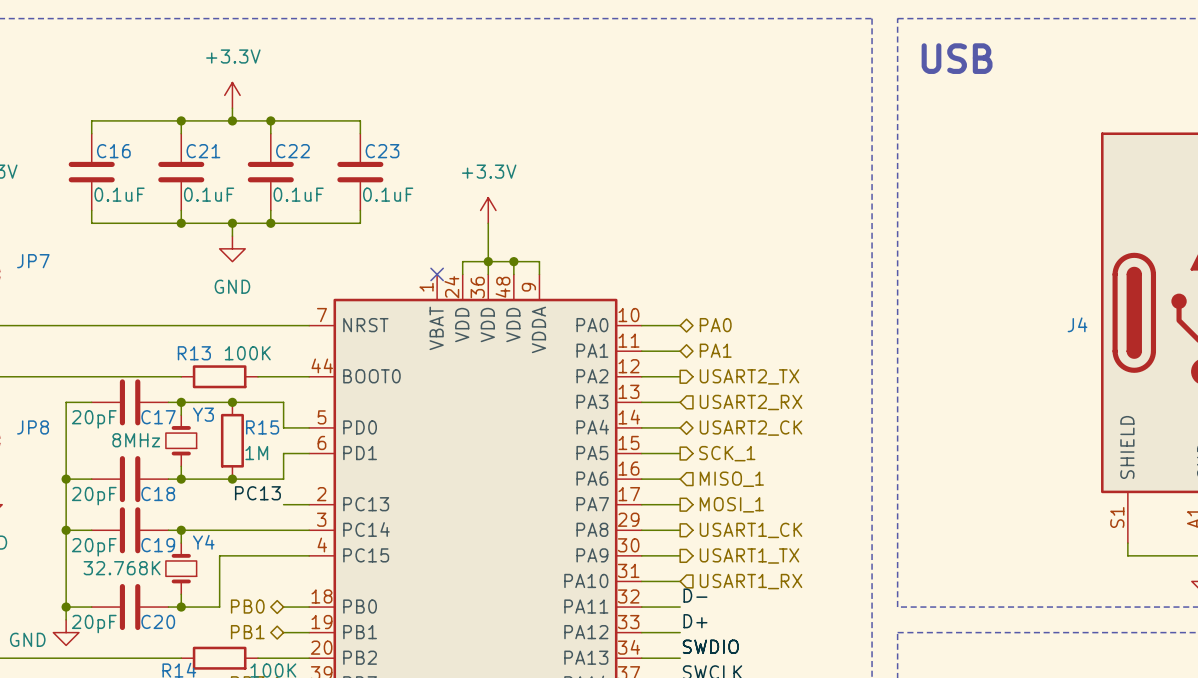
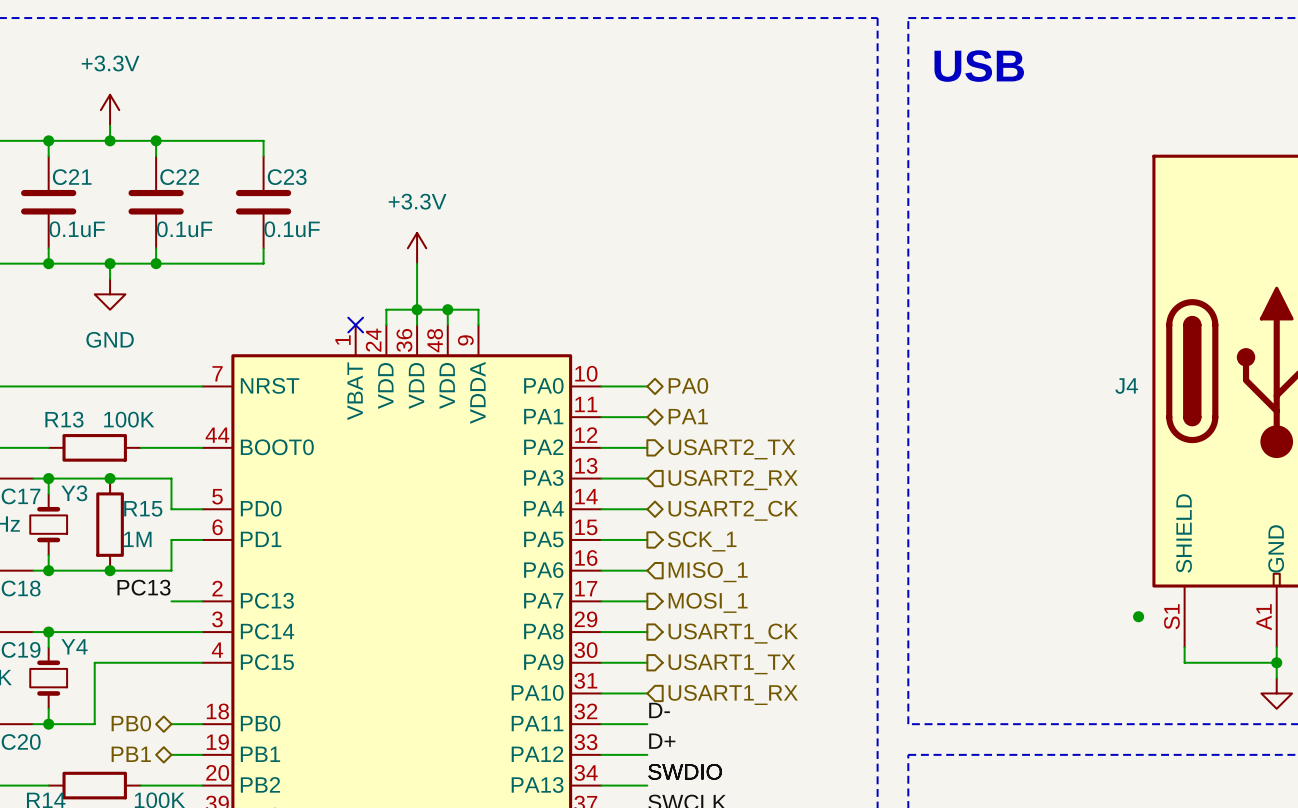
junction: none -> (1138, 616)

